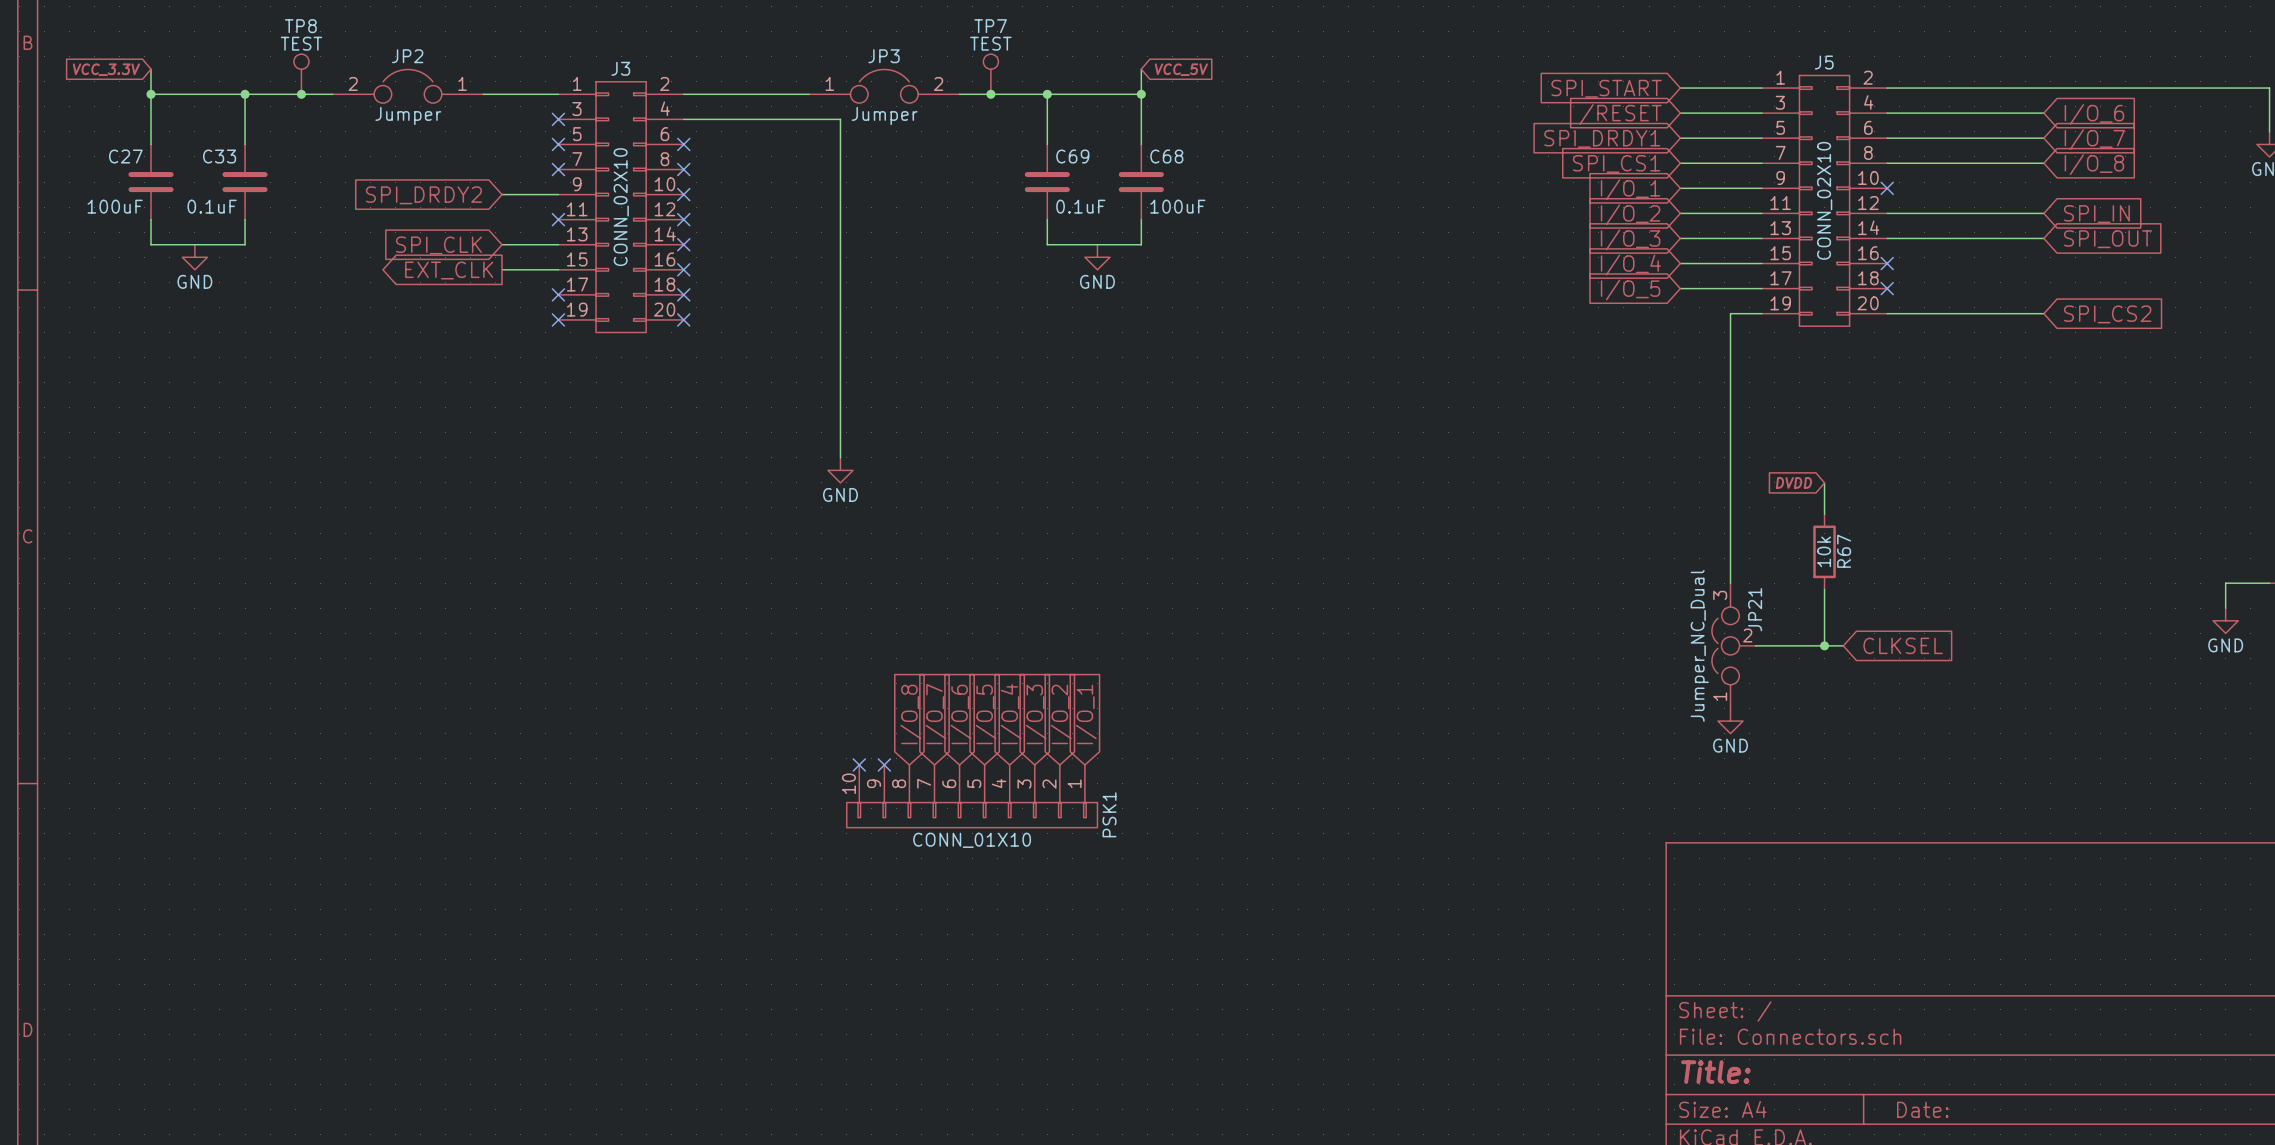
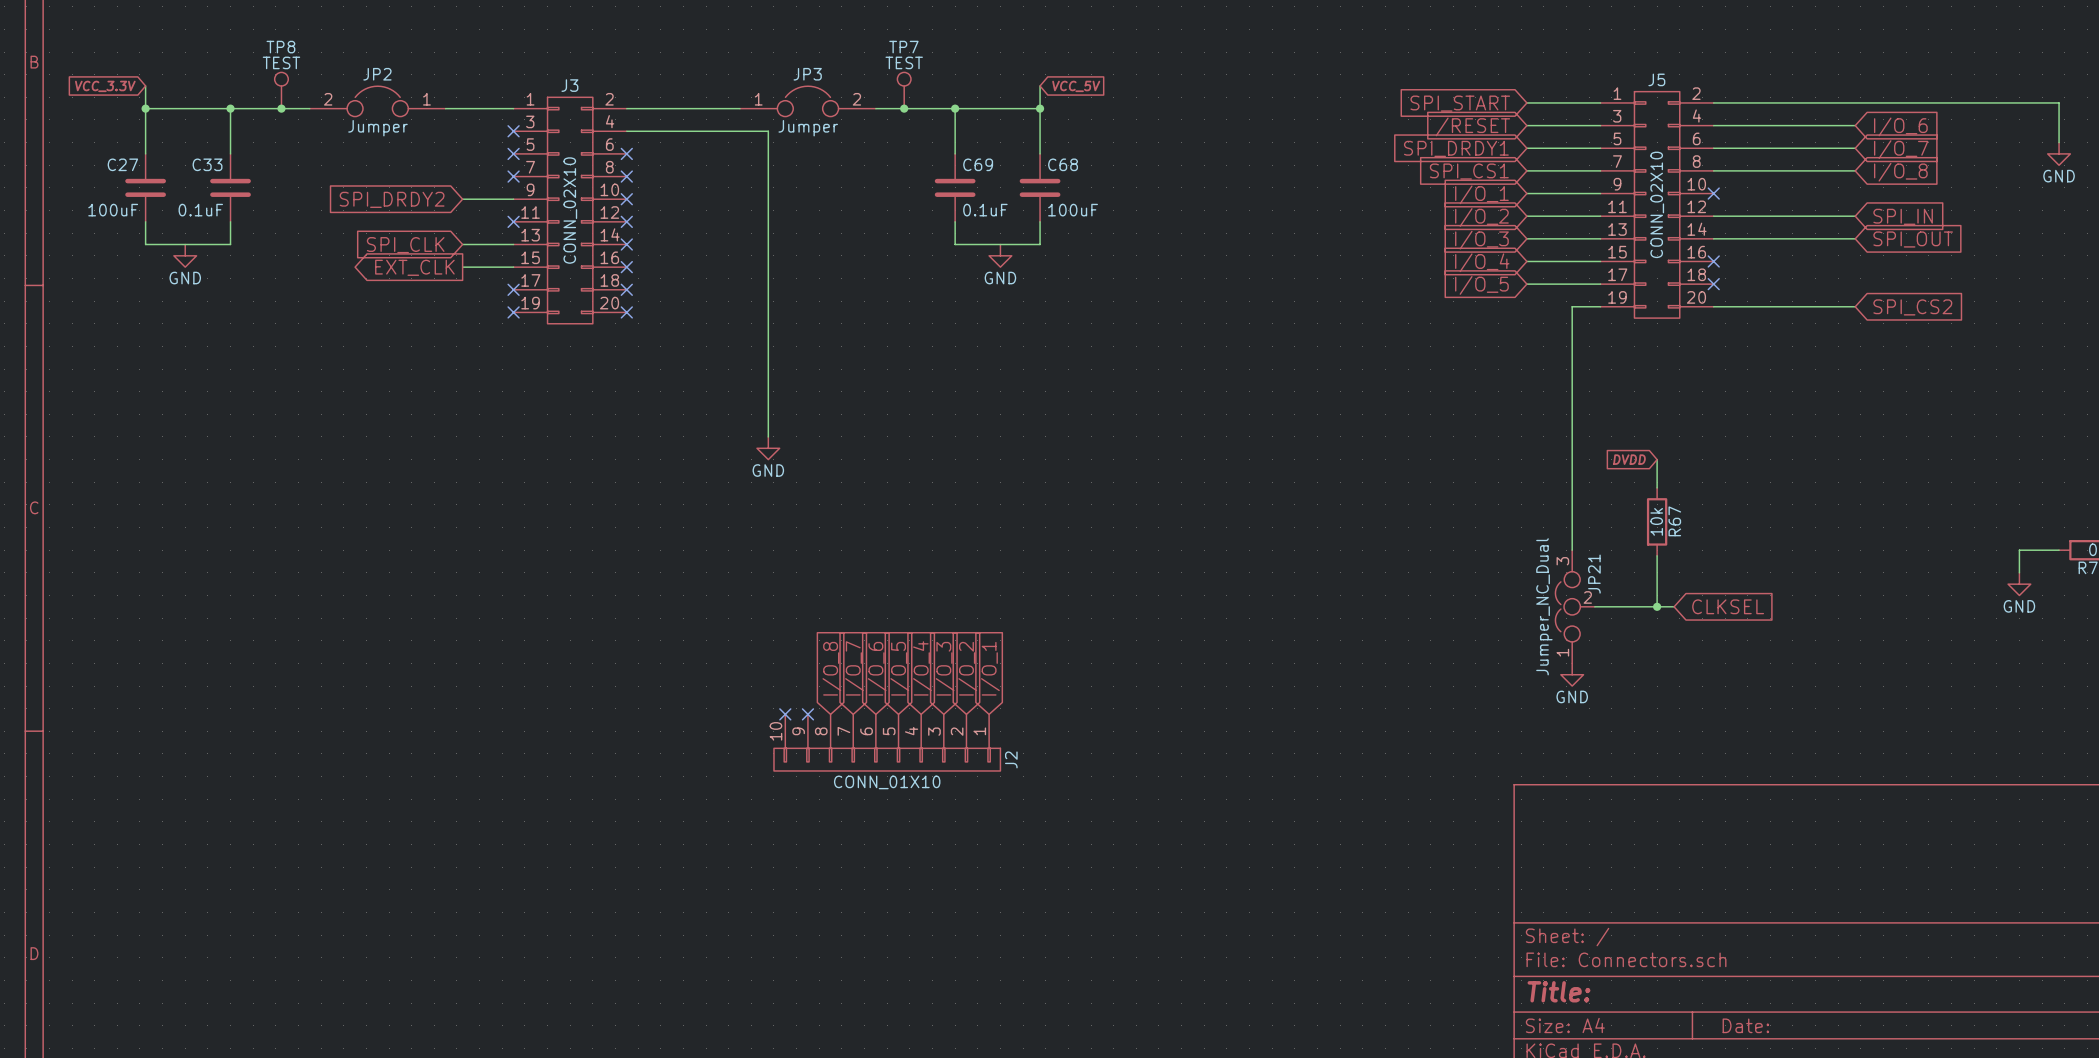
PSK1 name: PSK1 (1109, 814) -> J2 (1011, 759)

